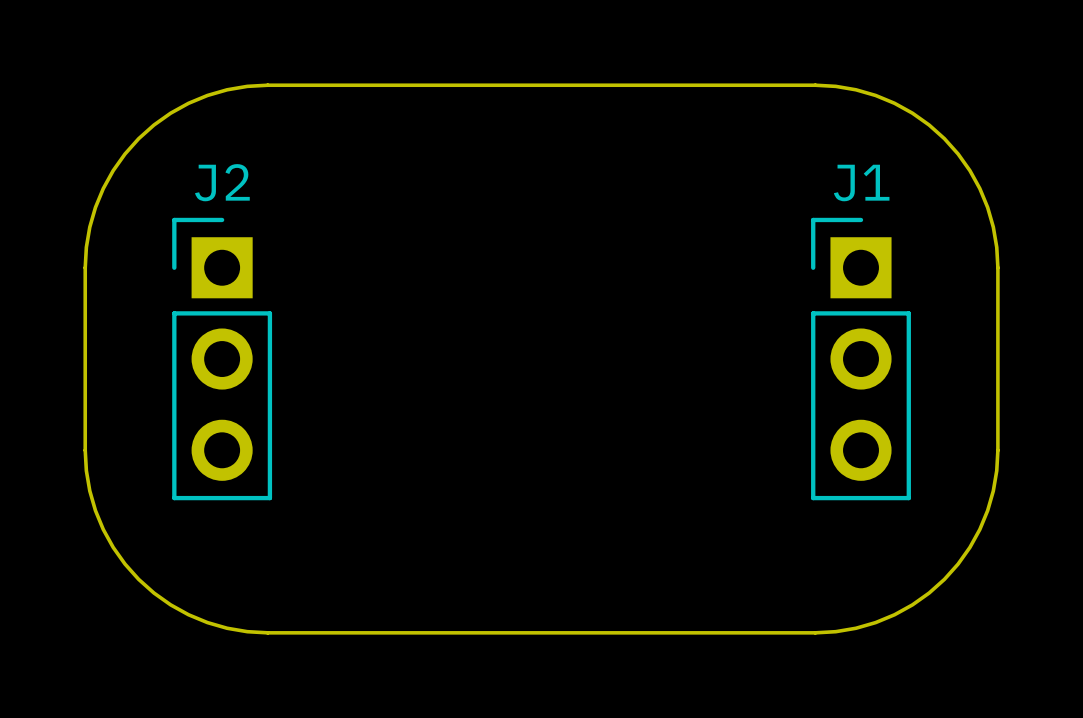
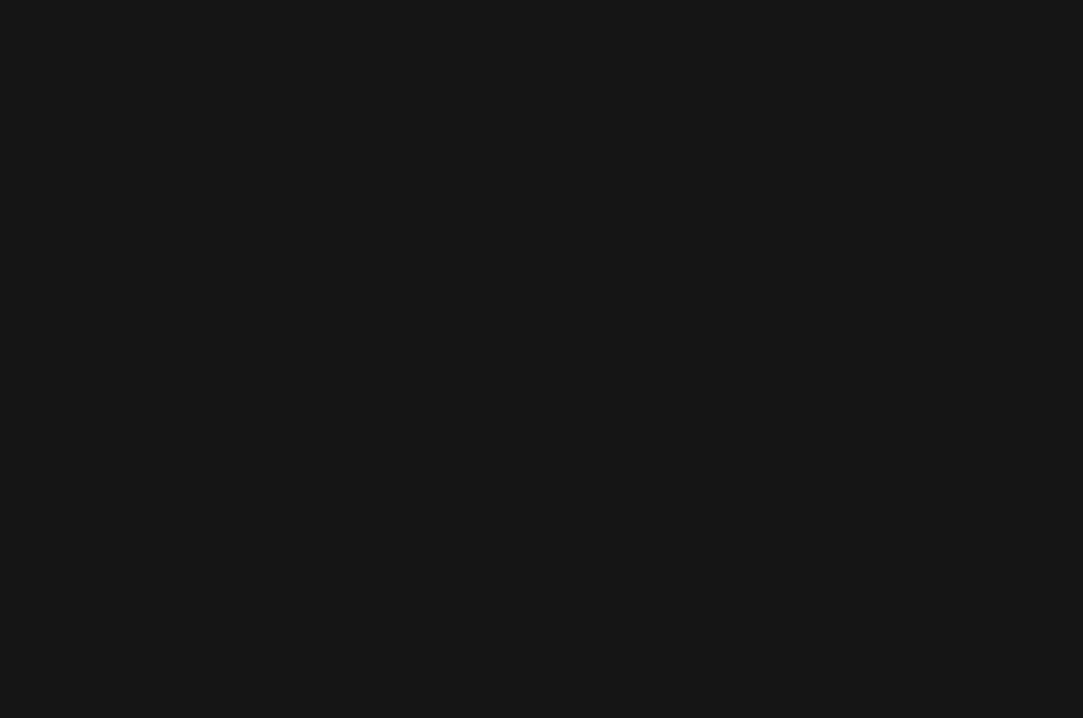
board edge: (815, 85) (267, 85) (227, 89) (188, 103) (170, 113) (138, 138) (113, 170) (95, 207) (86, 247) (86, 470) (95, 510) (113, 547) (138, 579) (170, 604) (207, 622) (247, 631) (815, 632) (855, 628) (894, 614) (912, 604) (944, 579) (969, 547) (987, 510) (993, 490) (997, 450) (997, 267) (993, 227) (979, 188) (969, 170) (958, 153) (929, 125) (912, 113) (875, 95) (855, 89) (815, 85) -> none
J2: (222, 359) -> none
J1: (861, 359) -> none

